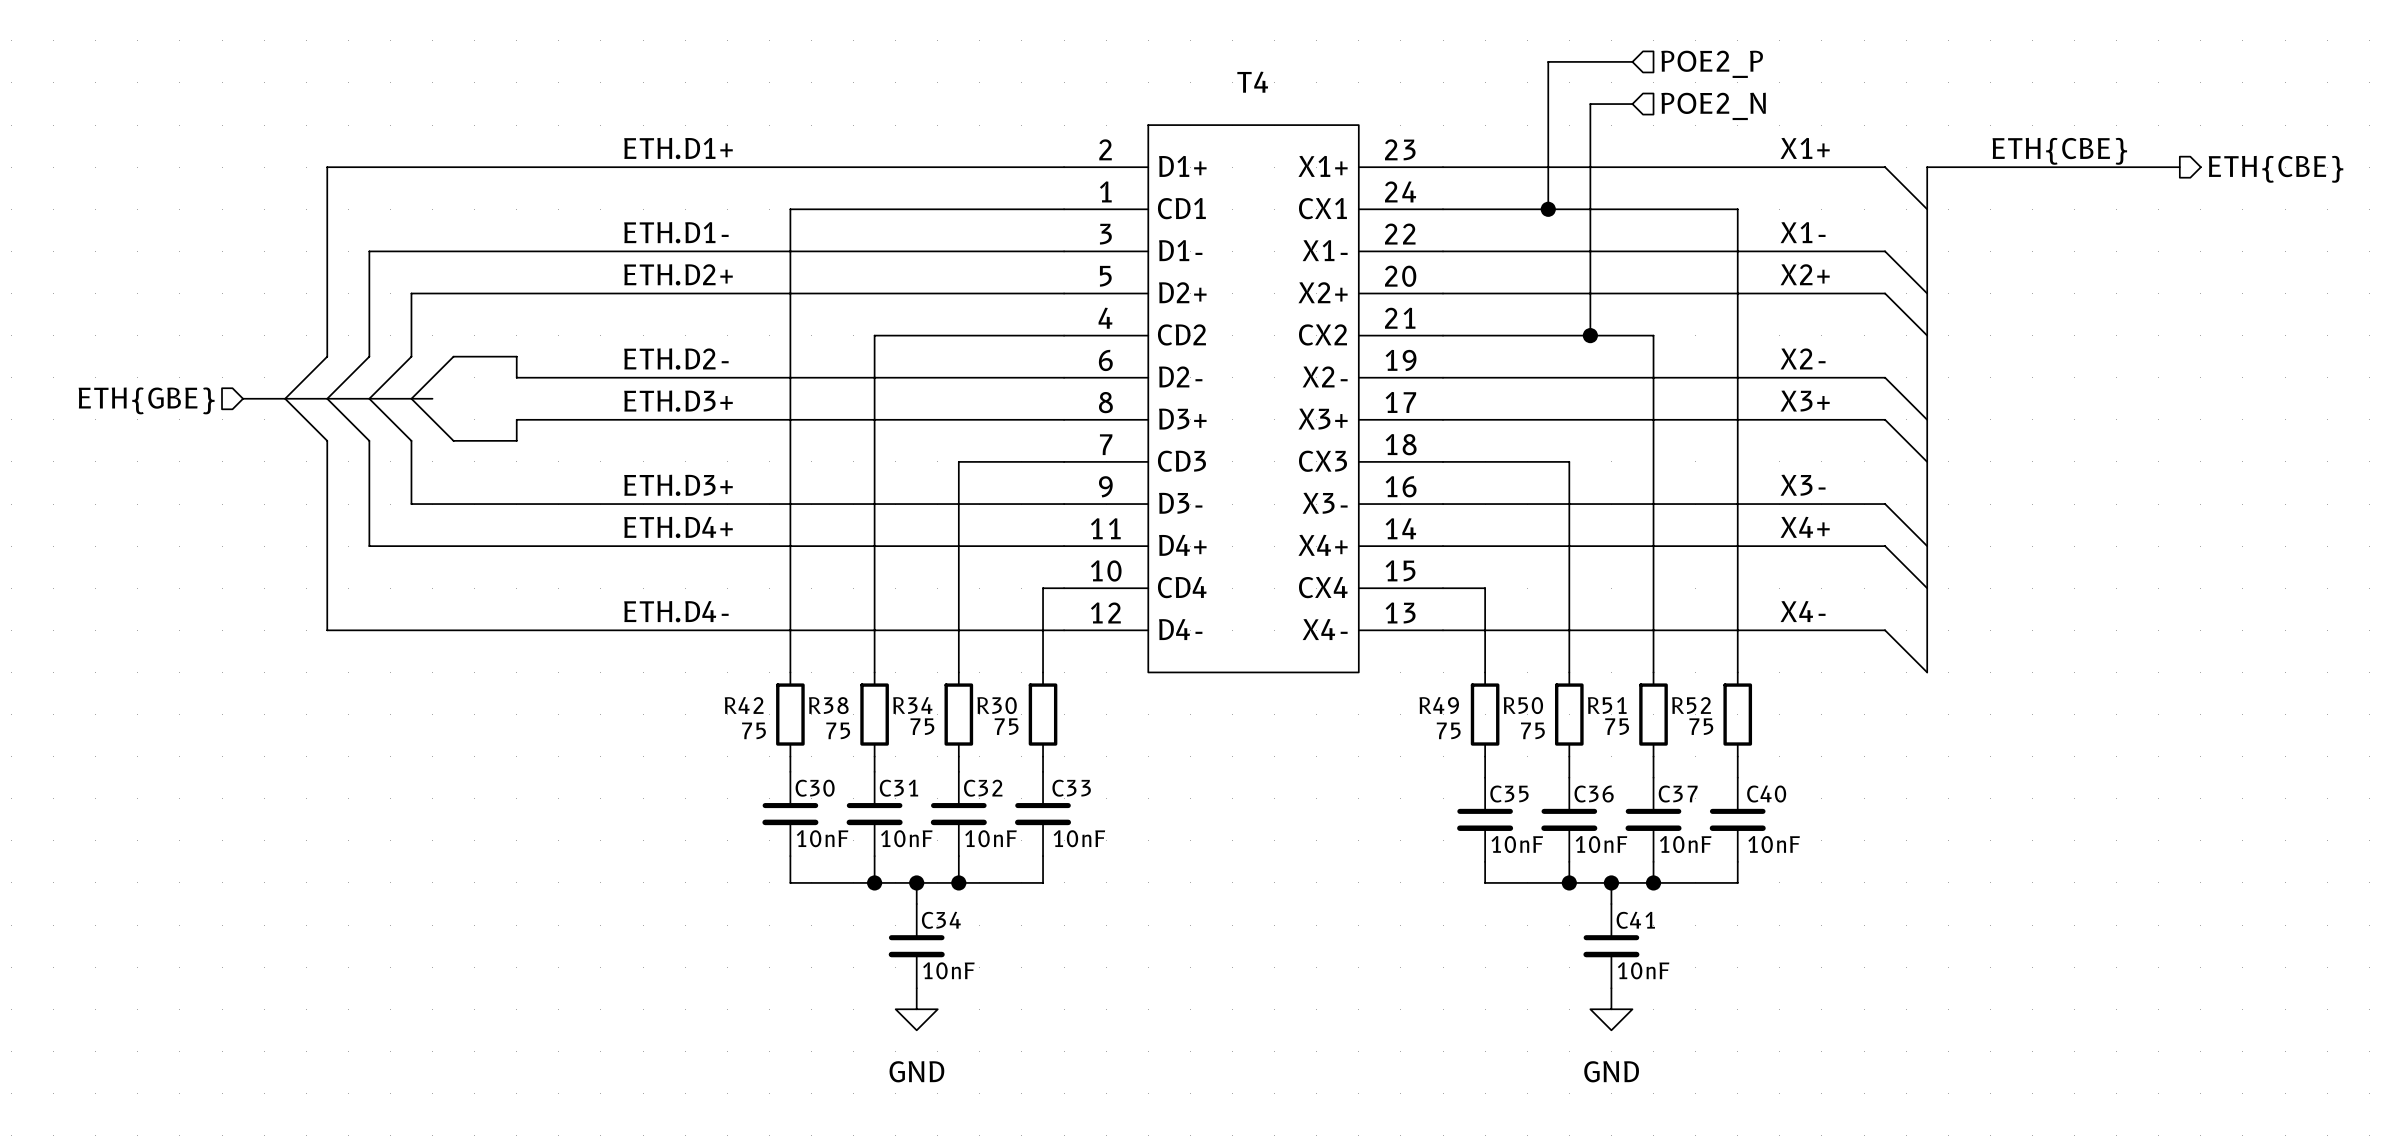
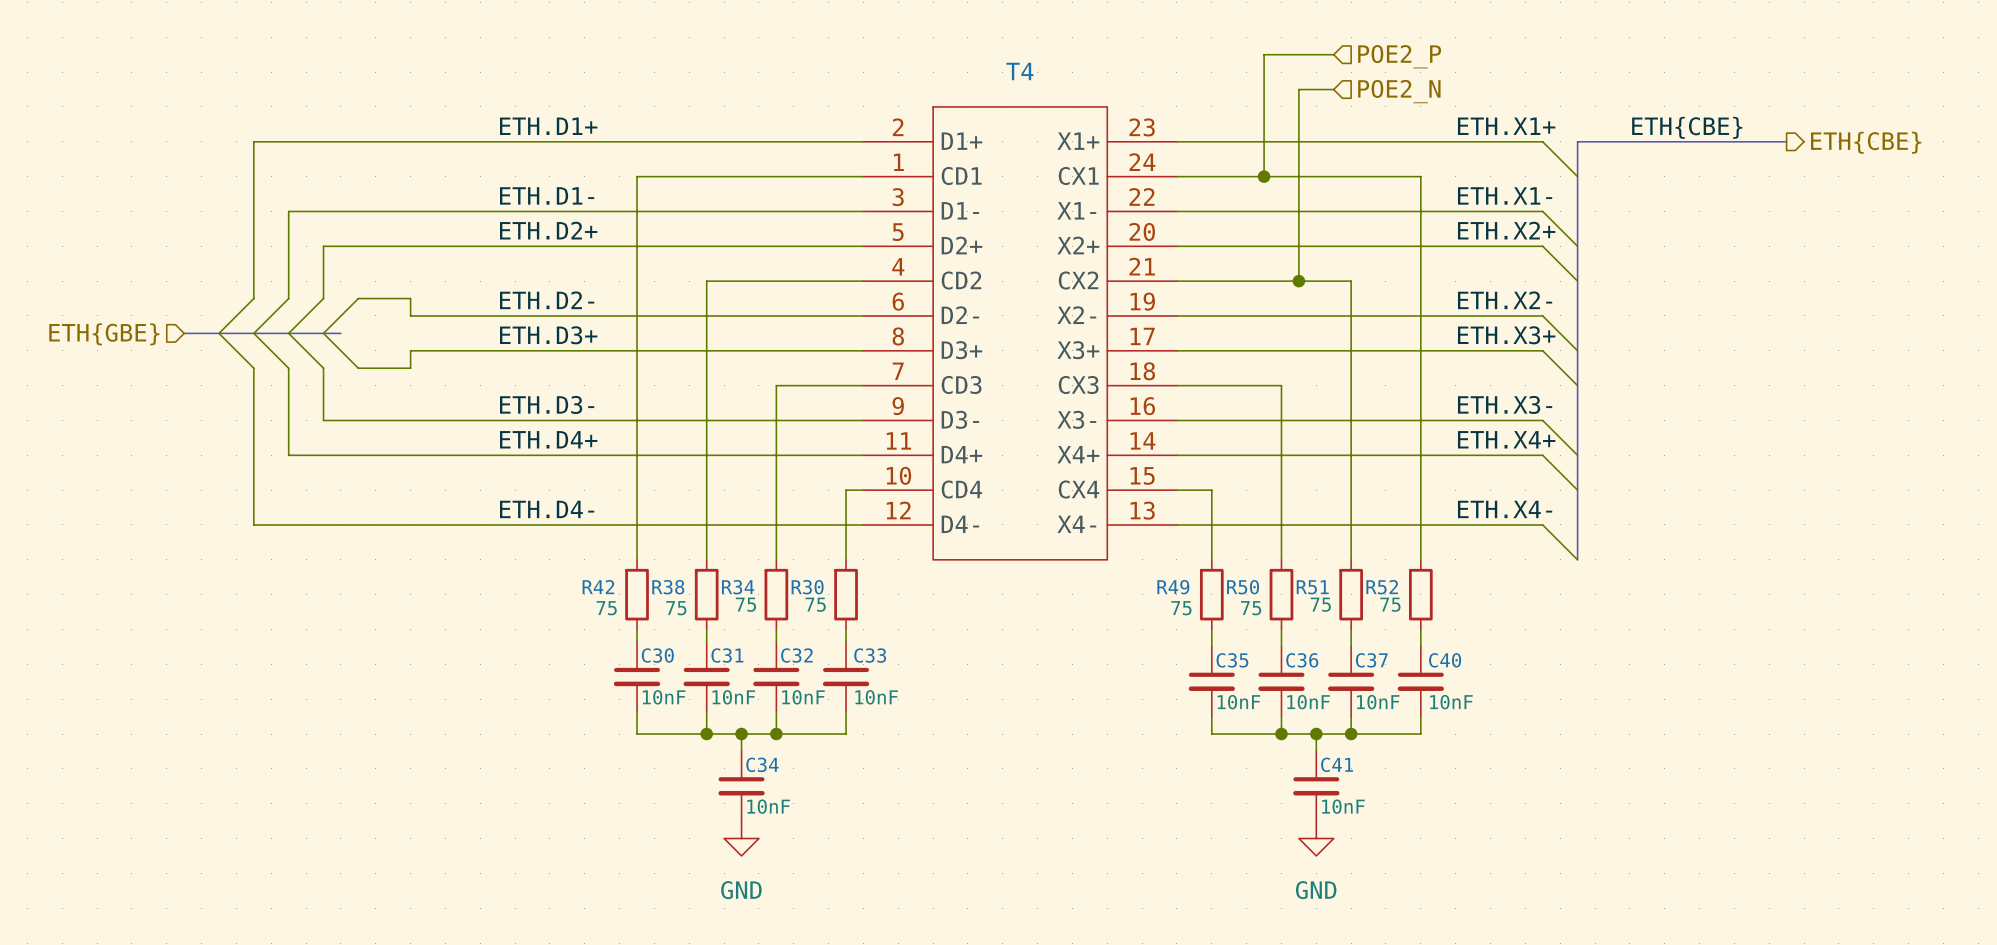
label: X1+ (1805, 148) -> ETH.X1+ (1506, 126)
label: X1- (1803, 232) -> ETH.X1- (1505, 195)
label: X2+ (1805, 274) -> ETH.X2+ (1506, 230)
label: X2- (1803, 358) -> ETH.X2- (1505, 300)
label: X3+ (1805, 401) -> ETH.X3+ (1506, 335)
label: ETH.D3+ (678, 485) -> ETH.D3- (547, 404)
label: X3- (1803, 485) -> ETH.X3- (1505, 404)
label: X4+ (1805, 527) -> ETH.X4+ (1506, 439)
label: X4- (1803, 611) -> ETH.X4- (1505, 509)

